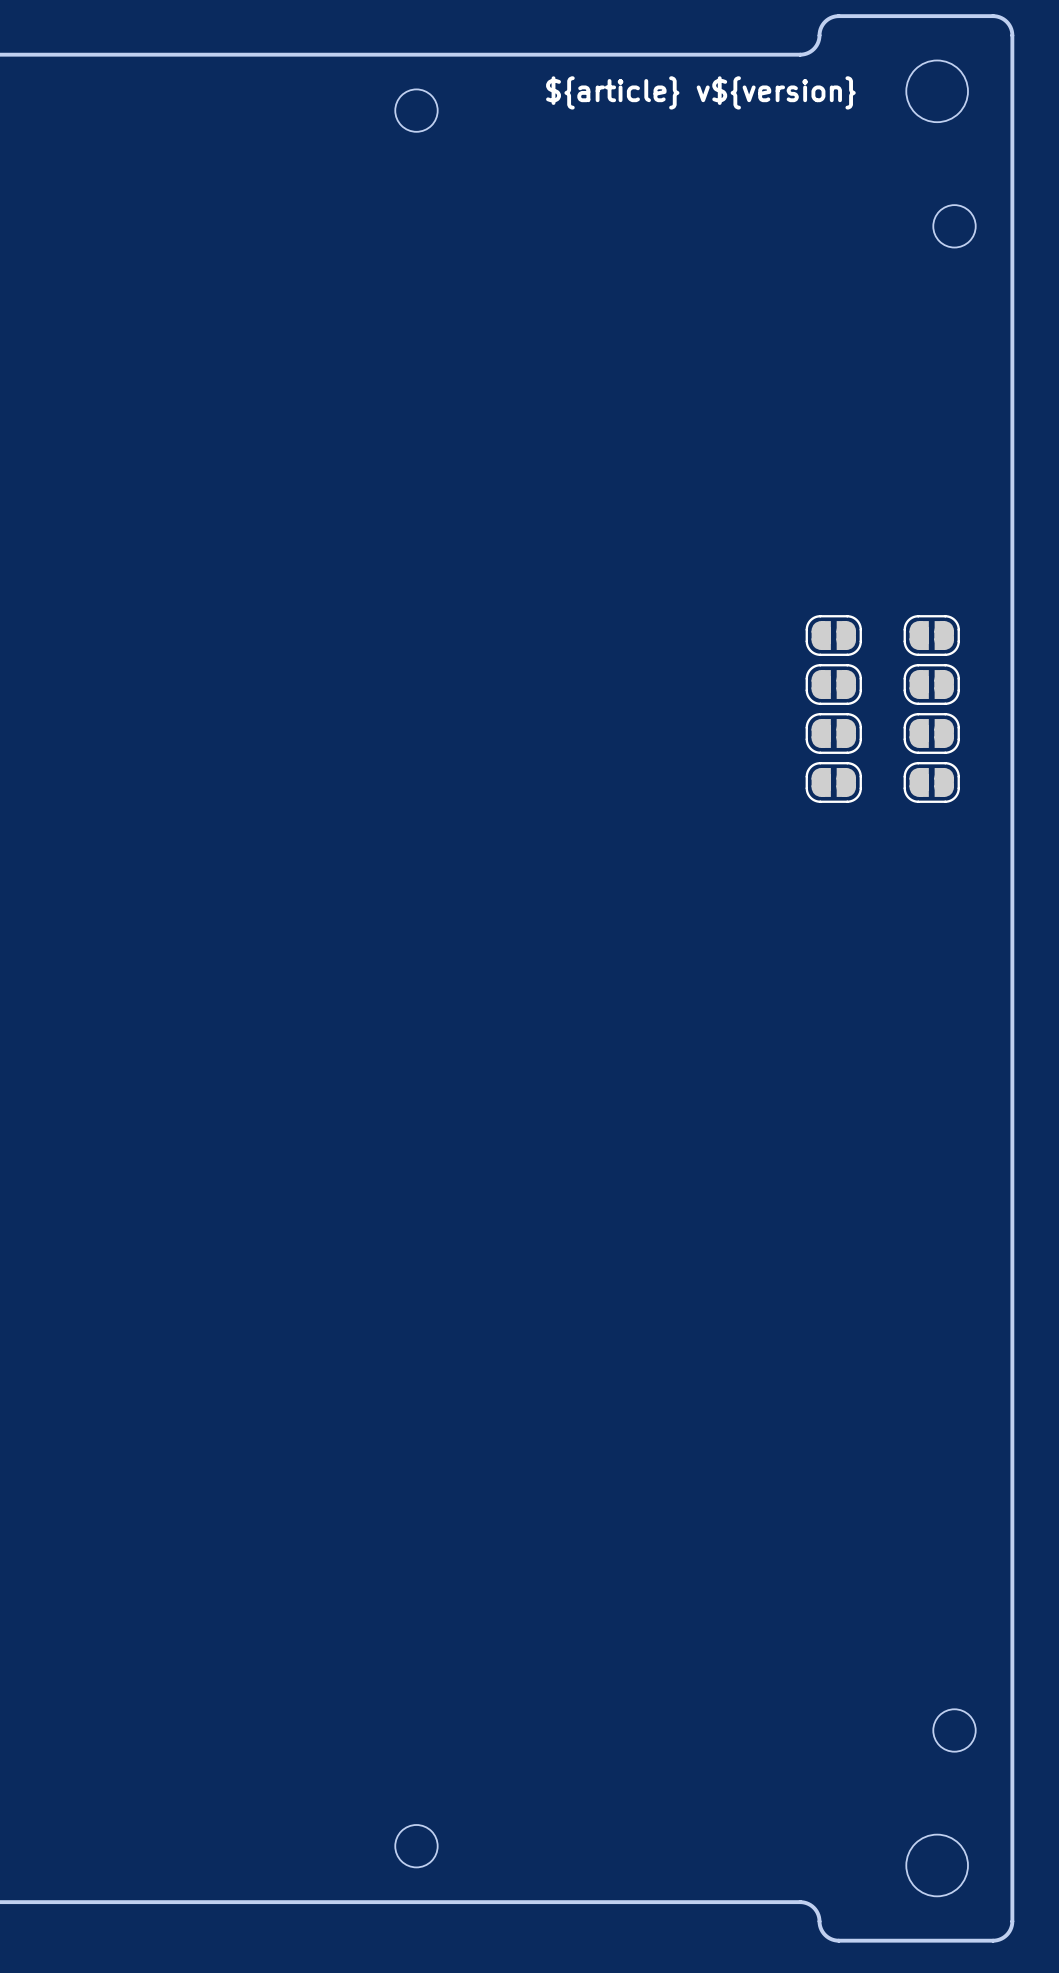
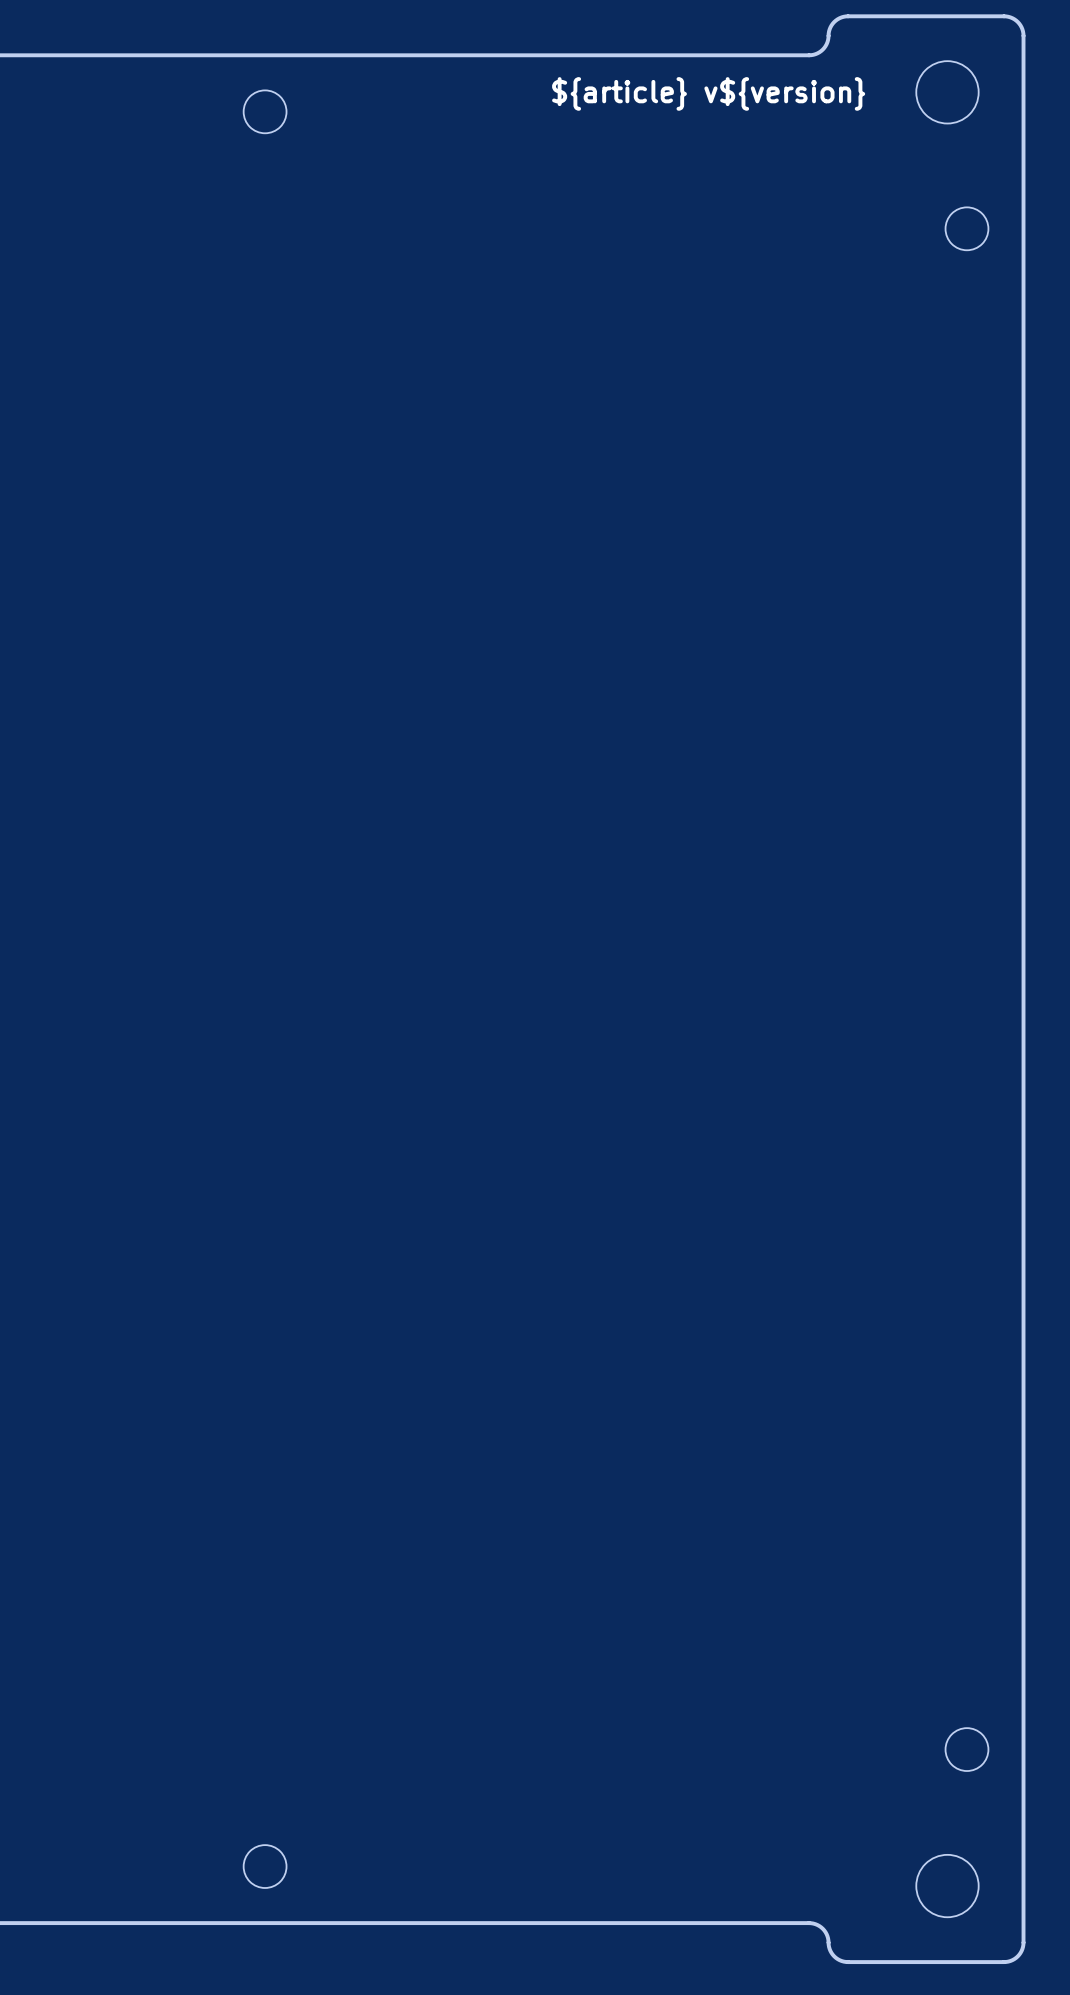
drawing: none -> [243, 89, 989, 1889]
drawing: [394, 88, 977, 1868] -> none
part: (833, 635) -> none
part: (931, 635) -> none
part: (833, 684) -> none
part: (931, 684) -> none
part: (833, 733) -> none
part: (931, 733) -> none
part: (833, 782) -> none
part: (931, 782) -> none

